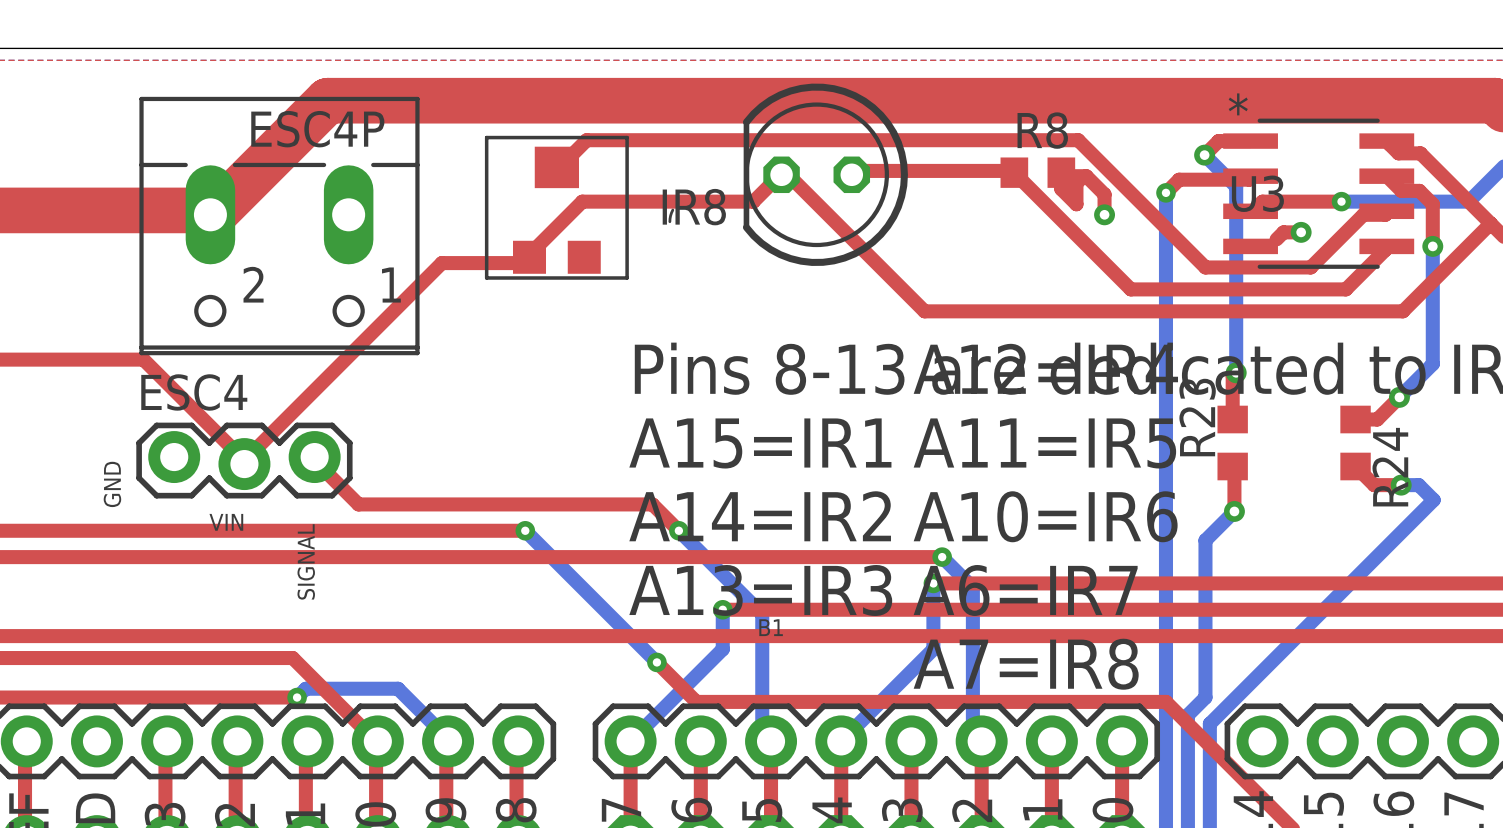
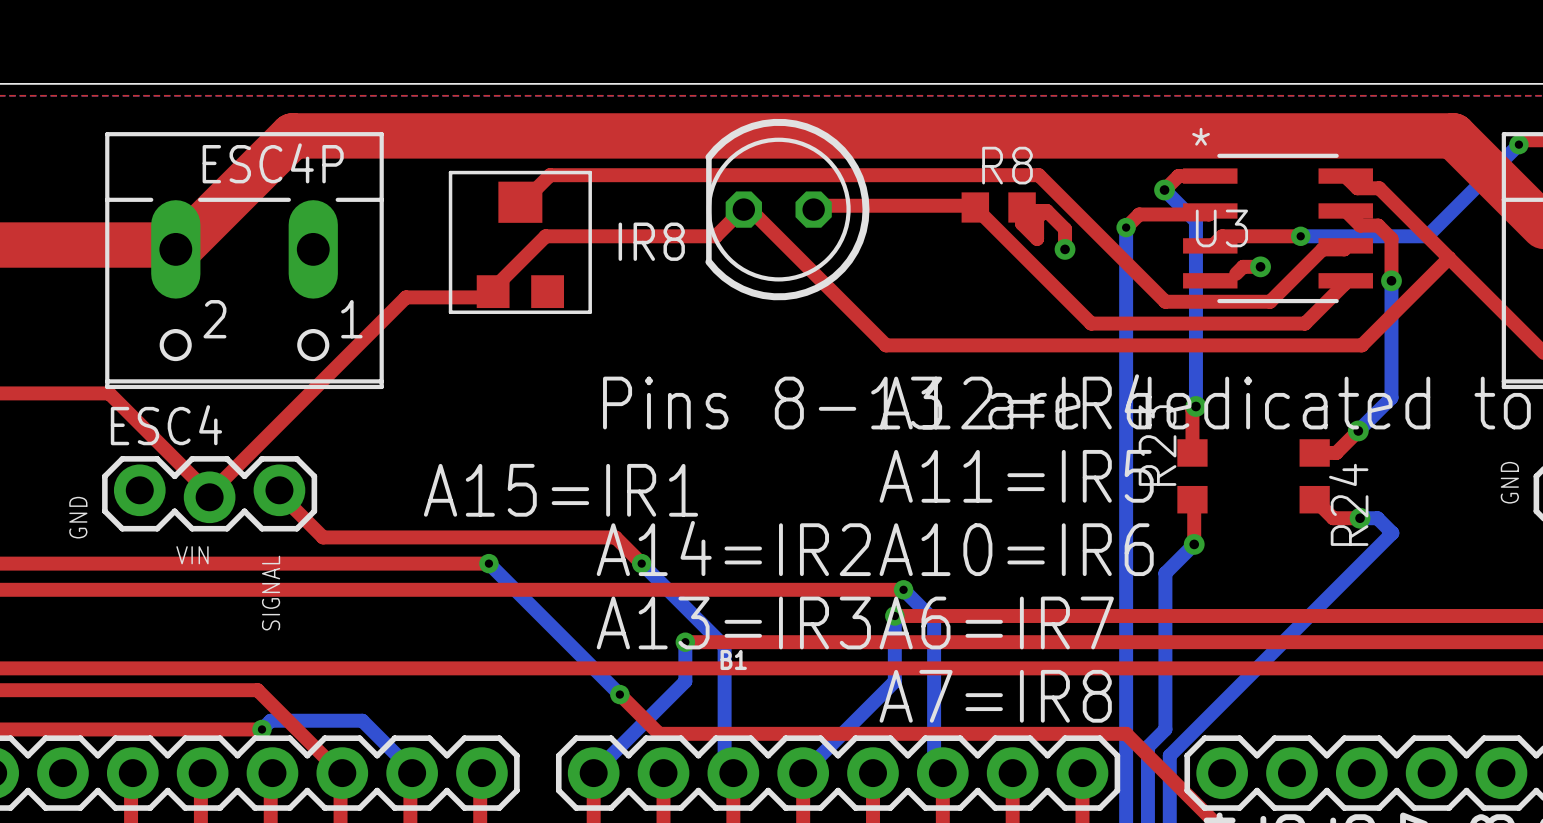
line: (672, 210) (669, 221) -> none
text position: A15=IR1 (760, 443) -> A15=IR1 (560, 490)

